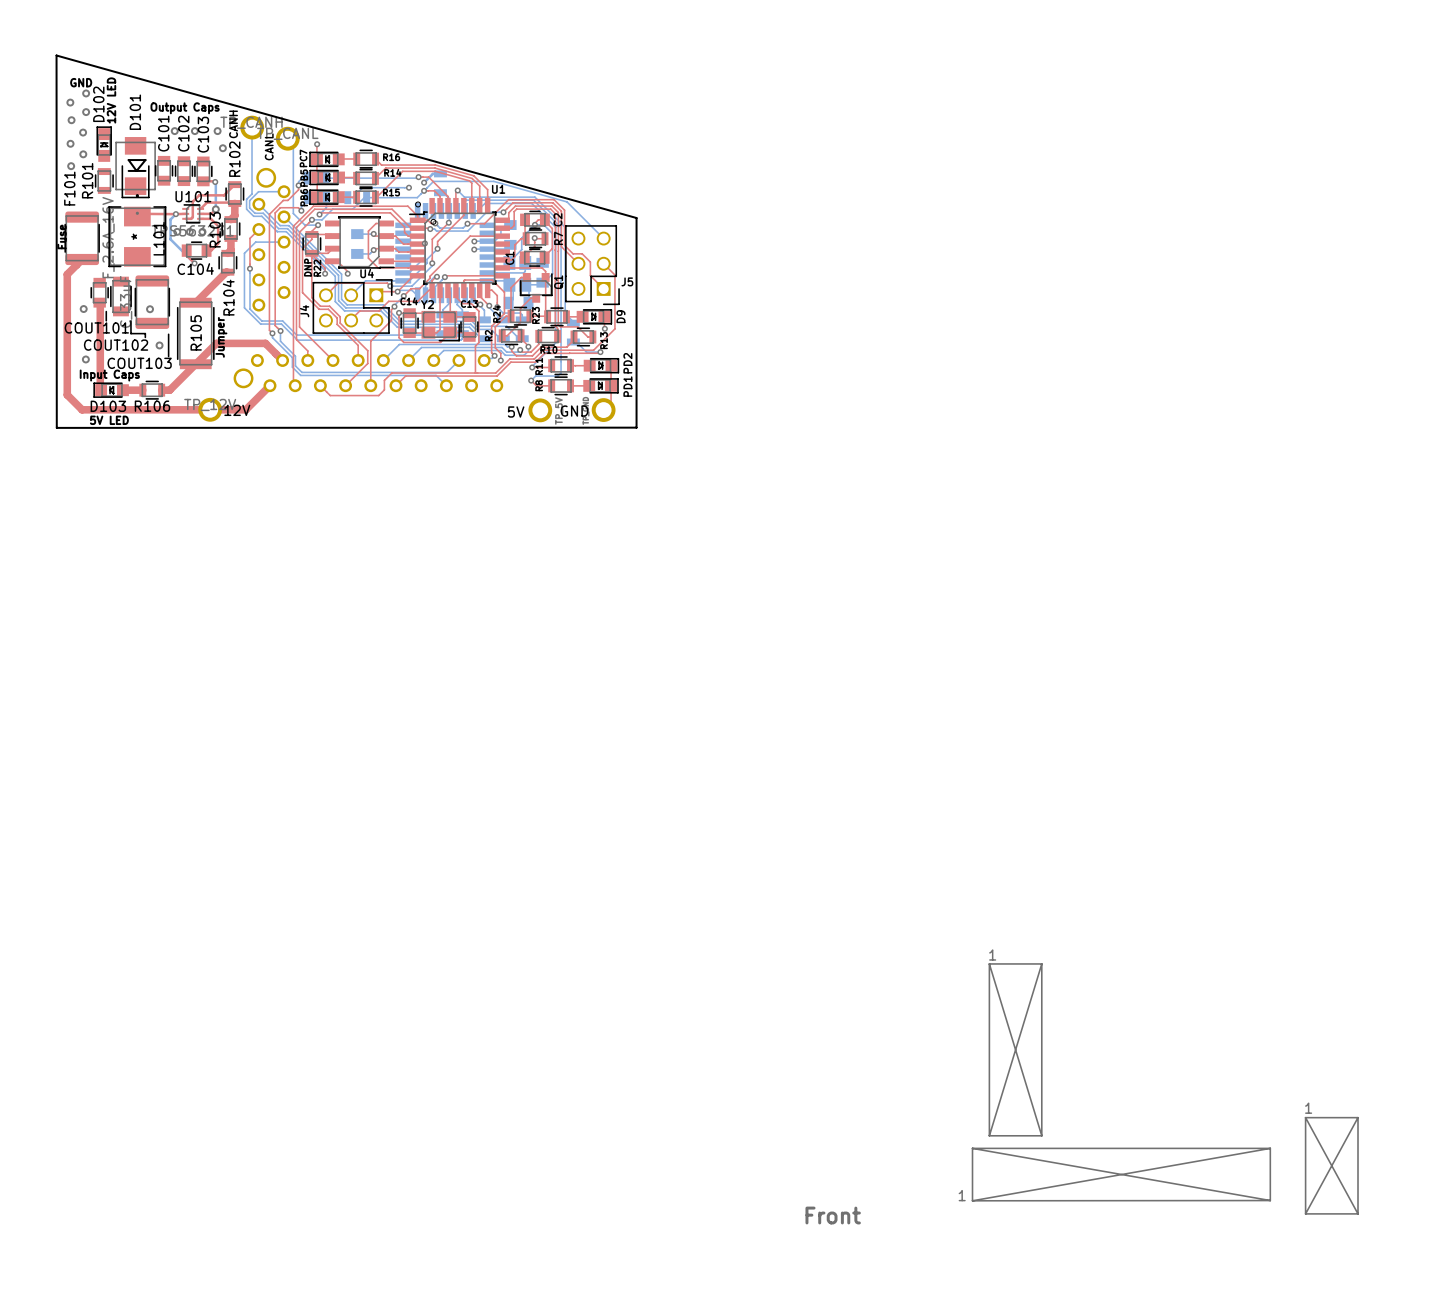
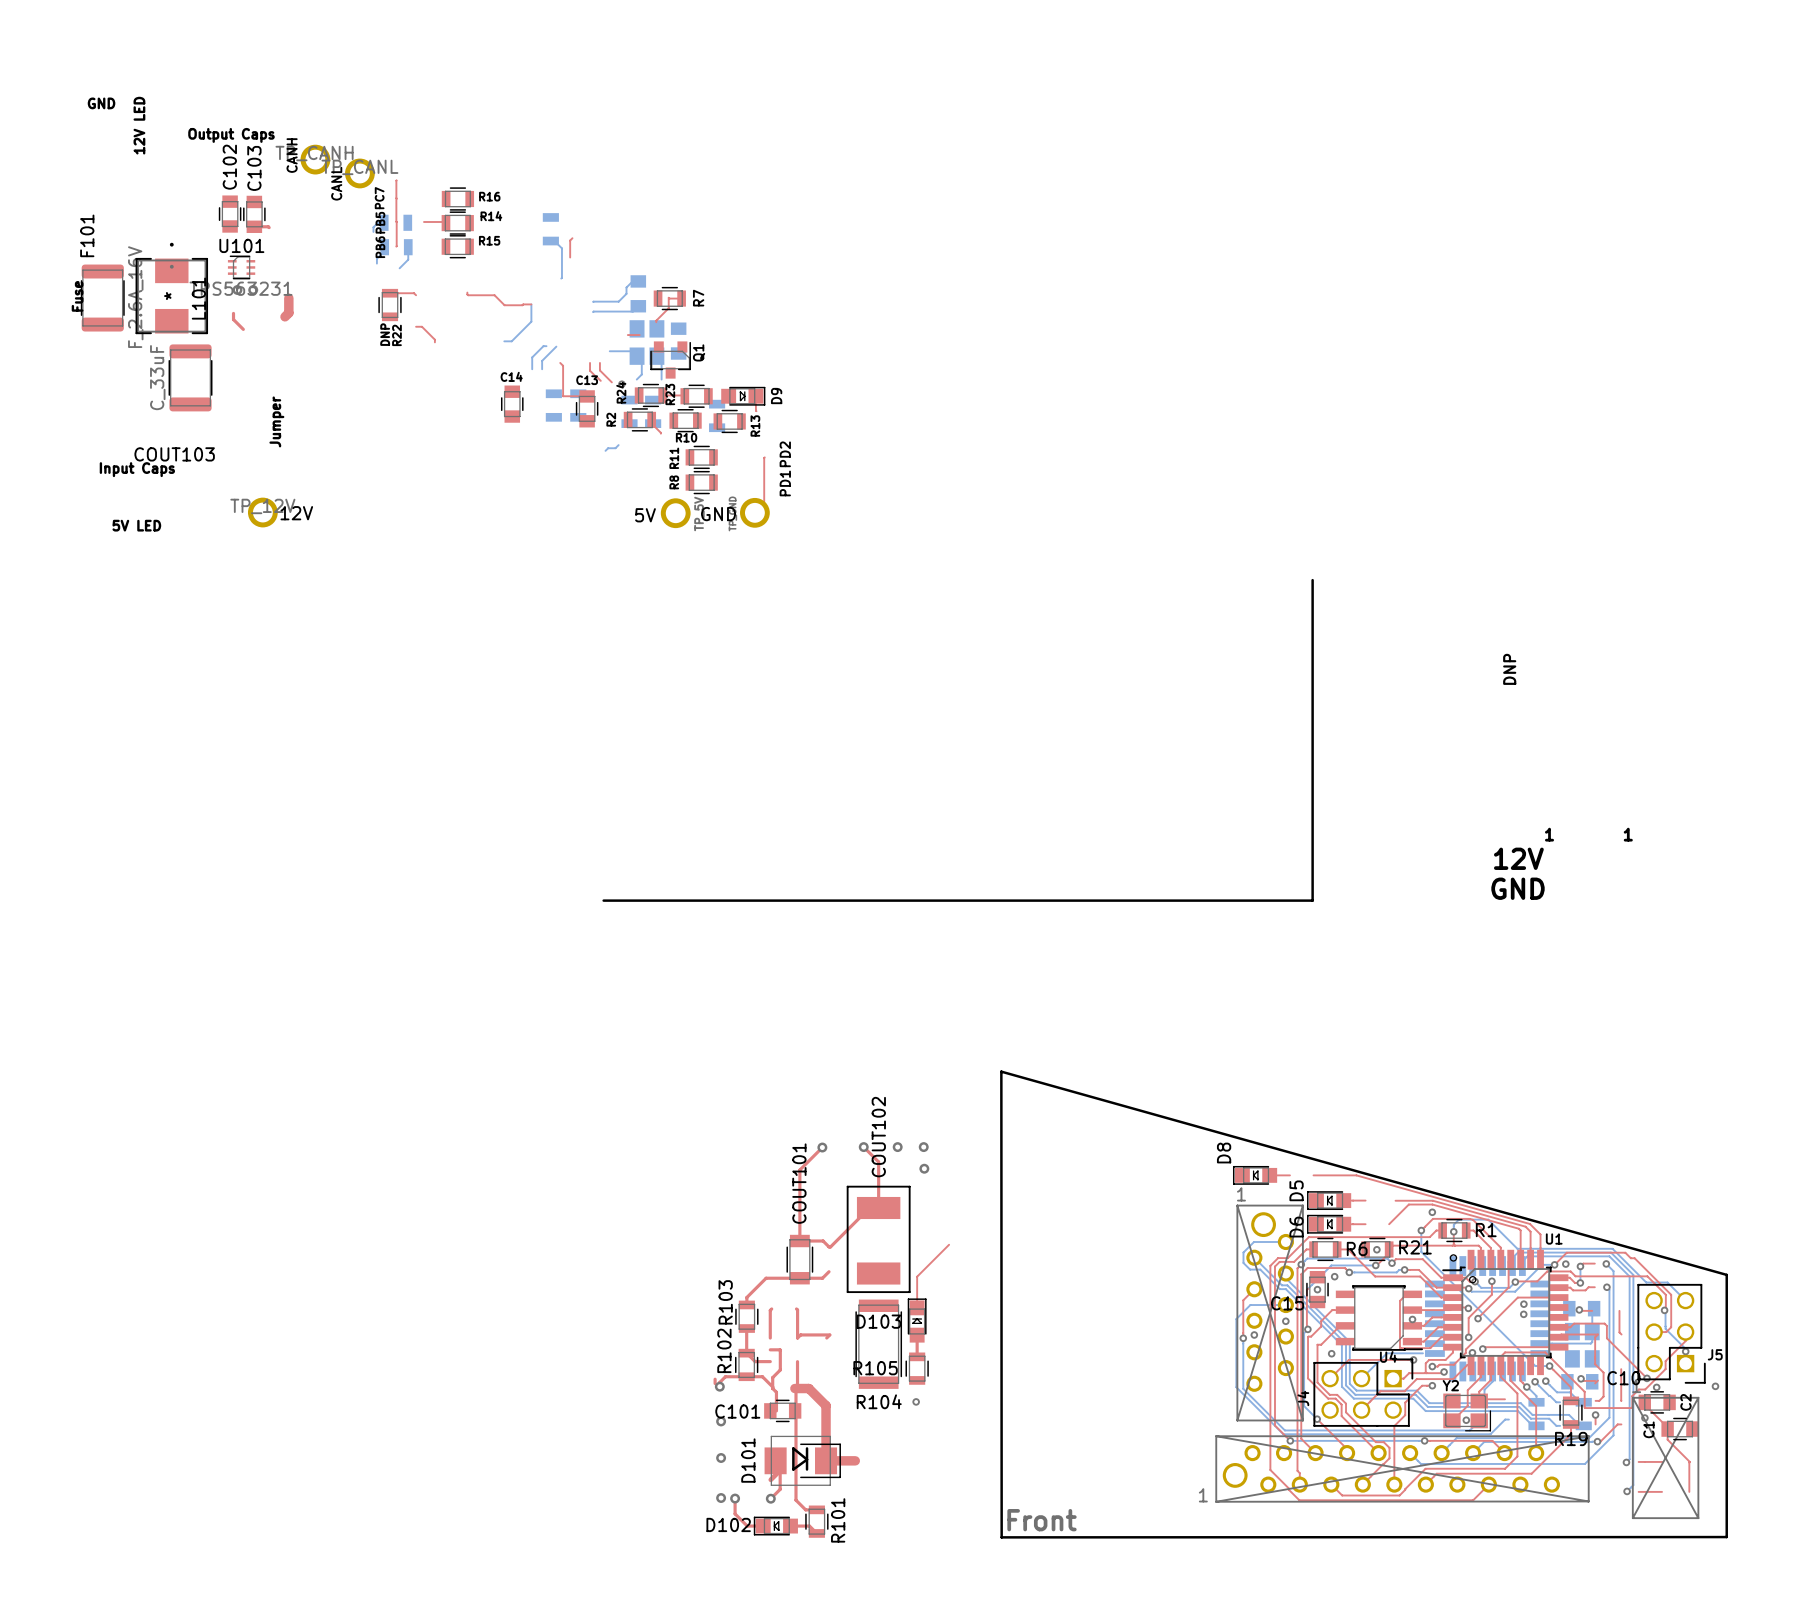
board edge: (56, 55) (56, 427) (636, 427) (636, 218) (56, 55) -> none
via: (86, 93) -> none
via: (70, 102) -> none
via: (86, 112) -> none
via: (71, 120) -> none
via: (174, 131) -> none
via: (194, 131) -> none
via: (217, 131) -> none
via: (83, 132) -> none
C101 name position: C101 (163, 133) -> C101 (737, 1411)
bottom track: (252, 138) (252, 193) (246, 199) (246, 209) (253, 216) (261, 216) (276, 231) -> none
bottom track: (287, 138) (293, 144) (293, 213) (304, 225) (318, 225) -> none
via: (70, 143) -> none
D102 rotation: 0° (104, 144) -> 90° counterclockwise (775, 1526)
D102 position: (104, 144) -> (775, 1526)
via: (317, 144) -> none
via: (222, 148) -> none
via: (83, 154) -> none
top track: (338, 158) (354, 158) -> none
R102 name position: R102 (234, 159) -> R102 (724, 1350)
part: (327, 159) -> none
top track: (375, 159) (381, 165) (435, 165) (473, 175) (487, 189) (487, 205) -> none
via: (71, 166) -> none
D101 rotation: 0° (135, 167) -> 90° counterclockwise (802, 1460)
D101 position: (135, 167) -> (802, 1460)
C101 rotation: 0° (164, 170) -> 90° clockwise (782, 1410)
C101 position: (164, 170) -> (782, 1410)
bottom track: (440, 173) (432, 173) (424, 182) -> none
part: (327, 177) -> none
top track: (418, 177) (428, 177) (447, 196) (447, 205) -> none
bottom track: (418, 177) (326, 178) -> none
via: (418, 177) -> none
top track: (375, 178) (385, 168) (434, 168) (472, 178) (479, 186) (479, 205) -> none
R101 name position: R101 (87, 180) -> R101 (838, 1520)
R101 position: (104, 180) -> (816, 1521)
bottom track: (215, 181) (215, 209) -> none
via: (215, 181) -> none
via: (424, 182) -> none
top track: (233, 183) (224, 195) (199, 195) (192, 201) (192, 217) (185, 218) -> none
top track: (298, 185) (298, 189) (287, 200) (283, 200) (269, 214) (269, 330) (272, 333) -> none
via: (298, 185) -> none
bottom track: (408, 187) (362, 187) (352, 197) (347, 197) -> none
via: (408, 187) -> none
top track: (424, 190) (434, 190) (440, 196) (440, 205) -> none
via: (424, 190) -> none
bottom track: (457, 190) (464, 197) (534, 197) (565, 227) (565, 313) (574, 323) -> none
via: (457, 190) -> none
bottom track: (284, 191) (258, 191) (249, 200) (249, 207) (254, 213) (263, 213) (278, 228) (287, 228) (335, 276) (335, 301) (344, 310) (381, 310) (397, 327) (469, 327) (481, 338) (484, 338) -> none
R102 position: (234, 194) -> (746, 1364)
part: (327, 197) -> none
top track: (338, 197) (356, 197) -> none
part: (357, 197) -> none
top track: (375, 197) (402, 171) (435, 171) (469, 180) (471, 183) (471, 205) -> none
top track: (236, 202) (206, 202) (200, 208) -> none
top track: (234, 203) (234, 215) (230, 219) -> none
bottom track: (258, 204) (280, 225) (288, 225) (338, 275) (338, 300) (345, 307) (382, 307) (398, 324) (470, 324) (475, 329) (491, 329) (500, 338) (503, 338) -> none
top track: (463, 205) (463, 215) (437, 241) (437, 248) -> none
top track: (215, 209) (211, 213) (200, 213) -> none
via: (215, 209) -> none
top track: (301, 210) (298, 207) (280, 207) (275, 212) (275, 325) (280, 330) -> none
via: (301, 210) -> none
bottom track: (465, 210) (466, 200) (533, 200) (561, 227) (561, 372) (557, 376) (535, 376) (531, 380) -> none
bottom track: (473, 210) (477, 210) (484, 203) (531, 203) (555, 227) (555, 342) (532, 367) -> none
top track: (503, 212) (512, 202) (552, 202) (561, 211) (561, 246) (578, 263) -> none
bottom track: (503, 212) (486, 212) (467, 231) (436, 231) (430, 229) -> none
via: (503, 212) -> none
top track: (185, 213) (140, 213) (137, 216) -> none
bottom track: (175, 214) (170, 219) (170, 239) (194, 263) -> none
via: (175, 214) -> none
top track: (319, 214) (321, 212) (390, 212) (404, 227) (404, 232) (408, 236) (417, 236) -> none
via: (319, 214) -> none
bottom track: (284, 216) (341, 274) (341, 299) (347, 304) (383, 304) (399, 321) (471, 321) (476, 326) (506, 326) (519, 338) (522, 338) -> none
top track: (200, 218) (210, 218) (218, 226) (218, 243) (211, 250) (206, 250) -> none
top track: (311, 219) (299, 232) (299, 327) (332, 360) -> none
bottom track: (311, 219) (322, 219) (332, 209) (352, 209) (364, 197) (417, 197) (433, 181) (493, 181) (567, 201) (603, 238) -> none
via: (311, 219) -> none
top track: (525, 219) (526, 238) (521, 238) (514, 245) (514, 256) (511, 259) (502, 259) -> none
C2 position: (534, 219) -> (1657, 1402)
top track: (502, 220) (508, 220) (508, 212) (515, 206) (551, 206) (558, 212) (558, 251) -> none
top track: (448, 222) (432, 239) (432, 263) -> none
via: (448, 222) -> none
top track: (386, 223) (376, 223) (368, 231) (368, 258) (378, 267) (417, 267) -> none
top track: (435, 223) (431, 223) (427, 220) (417, 220) (417, 216) (407, 206) (313, 206) (293, 226) (293, 383) (295, 385) -> none
bottom track: (435, 223) (439, 228) (463, 228) (467, 223) -> none
via: (435, 223) -> none
top track: (467, 223) (484, 223) (508, 199) (554, 199) (564, 210) (564, 245) (573, 253) (582, 253) (590, 262) (590, 275) (603, 288) -> none
via: (467, 223) -> none
top track: (534, 224) (538, 219) (544, 219) (552, 228) (552, 248) (544, 257) -> none
via: (534, 224) -> none
top track: (318, 225) (311, 231) (311, 239) (302, 248) (302, 292) (319, 309) (328, 309) (337, 318) (337, 324) (358, 345) (358, 360) -> none
via: (318, 225) -> none
top track: (502, 228) (511, 228) (514, 225) (514, 211) (516, 209) (550, 209) (555, 213) (555, 249) -> none
R103 name position: R103 (215, 229) -> R103 (725, 1302)
R103 position: (230, 229) -> (746, 1316)
top track: (258, 229) (249, 238) (249, 268) -> none
top track: (430, 229) (411, 228) (392, 209) (314, 209) (296, 227) (296, 339) (307, 350) (307, 360) -> none
via: (430, 229) -> none
via: (177, 231) -> none
bottom track: (277, 231) (286, 231) (325, 270) (325, 273) -> none
via: (373, 233) -> none
bottom track: (357, 234) (372, 234) -> none
top track: (502, 236) (470, 236) (419, 288) (411, 288) (403, 296) -> none
via: (534, 238) -> none
part: (271, 239) -> none
via: (474, 241) -> none
bottom track: (284, 242) (255, 242) (244, 253) (244, 307) (260, 324) (281, 324) (297, 340) (460, 340) (462, 333) -> none
U4 position: (359, 242) -> (1379, 1317)
via: (424, 243) -> none
part: (357, 244) -> none
top track: (332, 248) (328, 253) (311, 253) (311, 297) (320, 306) (329, 306) (340, 316) (340, 323) (367, 350) (367, 363) (345, 385) -> none
bottom track: (437, 248) (426, 259) (426, 263) (409, 280) (365, 280) (351, 295) -> none
via: (437, 248) -> none
U1 position: (459, 248) -> (1505, 1312)
R104 footprint: [218, 249, 238, 276] -> [855, 1299, 903, 1389]
via: (474, 249) -> none
C104: (196, 250) -> none
top track: (373, 250) (395, 248) (398, 252) (417, 252) -> none
bottom track: (373, 250) (369, 253) (357, 253) -> none
via: (373, 250) -> none
top track: (555, 250) (555, 326) (557, 328) (557, 336) -> none
top track: (558, 251) (558, 324) (560, 326) (577, 326) (587, 336) (592, 336) -> none
part: (445, 253) -> none
top track: (311, 254) (325, 268) (325, 273) -> none
C1 position: (534, 257) -> (1680, 1429)
top track: (82, 259) (67, 274) (67, 394) (82, 409) (245, 409) (270, 385) -> none
top track: (417, 259) (386, 261) -> none
bottom track: (509, 262) (521, 249) (521, 238) (534, 224) (543, 224) (552, 233) (552, 273) (540, 284) (525, 284) -> none
bottom track: (542, 262) (525, 262) (523, 272) (487, 272) -> none
via: (194, 263) -> none
bottom track: (432, 263) (432, 265) (411, 286) (390, 286) -> none
via: (432, 263) -> none
top track: (603, 263) (614, 275) (614, 328) (593, 350) (543, 350) (534, 359) (509, 359) (495, 373) (391, 373) (384, 380) (384, 389) (378, 395) (330, 395) (320, 385) -> none
J5 position: (592, 265) -> (1671, 1333)
top track: (511, 267) (542, 267) (545, 271) (545, 316) -> none
bottom track: (249, 268) (249, 309) (261, 321) (282, 321) (296, 335) (442, 333) -> none
via: (249, 268) -> none
top track: (227, 272) (196, 301) -> none
via: (325, 273) -> none
via: (347, 273) -> none
top track: (417, 275) (413, 275) (397, 291) (379, 291) (369, 300) -> none
top track: (502, 275) (444, 277) -> none
COUT102 footprint: [110, 276, 132, 317] -> [846, 1185, 911, 1294]
top track: (436, 276) (432, 280) (432, 290) (429, 290) (417, 301) (388, 301) (379, 311) (359, 311) (351, 319) -> none
via: (436, 276) -> none
COUT101 footprint: [90, 277, 109, 308] -> [786, 1234, 814, 1285]
via: (444, 277) -> none
top track: (526, 277) (521, 277) (511, 287) (511, 316) (506, 316) (495, 326) (495, 347) (500, 353) (500, 360) -> none
top track: (390, 286) (387, 283) (338, 283) (325, 295) -> none
via: (390, 286) -> none
top track: (440, 290) (440, 329) (436, 332) (409, 333) -> none
top track: (455, 290) (455, 296) (462, 303) (471, 303) (478, 311) (478, 342) (475, 346) (475, 373) -> none
top track: (463, 290) (464, 280) (492, 280) (504, 292) (504, 313) (491, 326) (491, 352) (494, 355) -> none
top track: (487, 290) (491, 290) (497, 295) (497, 307) -> none
bottom track: (397, 291) (412, 290) (417, 295) -> none
via: (397, 291) -> none
bottom track: (449, 295) (449, 303) (442, 309) (442, 314) -> none
bottom track: (457, 295) (457, 304) (462, 309) (462, 314) -> none
bottom track: (403, 296) (394, 306) -> none
via: (403, 296) -> none
R105 footprint: [177, 297, 215, 370] -> [905, 1352, 929, 1385]
top track: (536, 298) (530, 298) (520, 308) (520, 322) (507, 335) (502, 335) -> none
top track: (99, 302) (101, 390) -> none
part: (518, 302) -> none
bottom track: (480, 304) (484, 310) (484, 319) -> none
via: (480, 304) -> none
bottom track: (489, 305) (503, 319) -> none
via: (489, 305) -> none
J4 position: (352, 306) -> (1363, 1392)
top track: (394, 306) (391, 309) (391, 320) (370, 341) (370, 385) -> none
via: (394, 306) -> none
bottom track: (497, 307) (503, 313) (520, 313) (522, 319) -> none
via: (83, 309) -> none
via: (150, 309) -> none
line: (106, 311) (106, 320) -> none
via: (399, 312) -> none
top track: (428, 316) (424, 313) (399, 312) (399, 337) (403, 342) (440, 342) (450, 332) (465, 332) (469, 336) -> none
top track: (566, 316) (582, 316) -> none
line: (130, 320) (130, 333) (145, 333) (145, 337) -> none
Y2 position: (440, 326) -> (1467, 1412)
COUT101 name position: COUT101 (96, 327) -> COUT101 (799, 1183)
via: (604, 328) -> none
part: (484, 329) -> none
via: (280, 330) -> none
bottom track: (280, 331) (280, 341) (295, 356) (295, 365) (301, 372) (447, 372) (458, 360) -> none
R105 name position: R105 (196, 332) -> R105 (875, 1368)
bottom track: (272, 333) (272, 337) (292, 357) (292, 367) (300, 375) (436, 375) (446, 385) -> none
via: (272, 333) -> none
line: (168, 334) (168, 356) -> none
top track: (538, 335) (538, 344) (530, 352) (522, 352) (520, 349) -> none
top track: (574, 336) (574, 339) (566, 347) (541, 347) (532, 355) (516, 355) (511, 351) (511, 346) -> none
bottom track: (573, 342) (576, 342) (586, 352) (600, 352) -> none
COUT102 name position: COUT102 (116, 345) -> COUT102 (878, 1137)
via: (159, 345) -> none
bottom track: (511, 346) (505, 344) (399, 344) (383, 360) -> none
via: (511, 346) -> none
bottom track: (528, 346) (528, 351) (524, 355) (505, 355) (500, 350) (443, 350) (433, 360) -> none
via: (528, 346) -> none
bottom track: (520, 349) (518, 352) (506, 352) (502, 347) (421, 347) (408, 360) -> none
via: (520, 349) -> none
top track: (600, 352) (569, 353) -> none
via: (600, 352) -> none
top track: (569, 353) (544, 353) (535, 362) (510, 362) (497, 376) (405, 376) (395, 385) -> none
via: (494, 355) -> none
via: (85, 359) -> none
top track: (282, 360) (265, 343) (216, 343) (169, 390) (161, 390) -> none
via: (500, 360) -> none
top track: (551, 365) (549, 367) (532, 367) -> none
top track: (570, 365) (589, 365) -> none
part: (601, 365) -> none
via: (532, 367) -> none
part: (368, 373) -> none
top track: (531, 380) (536, 385) (551, 385) (551, 381) -> none
via: (531, 380) -> none
top track: (570, 385) (589, 385) -> none
part: (600, 385) -> none
D103 rotation: 0° (111, 390) -> 90° clockwise (917, 1320)
D103 position: (111, 390) -> (917, 1320)
top track: (122, 390) (142, 390) -> none
R106: (152, 390) -> none
board edge: none -> (1312, 580) (1312, 900) (603, 900)
text: none -> DNP (1509, 669)
text: none -> 1 (1549, 834)
text: none -> 1 (1628, 834)
text: none -> 12V (1518, 858)
text: none -> GND (1518, 888)
board edge: none -> (1001, 1071) (1001, 1537) (1726, 1537) (1726, 1274) (1001, 1071)
via: none -> (822, 1147)
top track: none -> (863, 1147) (878, 1161) (878, 1208) (869, 1208) (830, 1246) (823, 1241) (799, 1241) (799, 1170) (822, 1147)
via: none -> (863, 1147)
via: none -> (897, 1147)
via: none -> (923, 1147)
via: none -> (924, 1168)
D8: none -> (1255, 1175)
top track: none -> (1269, 1175) (1289, 1175)
top track: none -> (1313, 1175) (1356, 1175) (1529, 1223) (1540, 1234) (1540, 1259)
D5: none -> (1329, 1200)
top track: none -> (1343, 1200) (1365, 1200)
top track: none -> (1395, 1200) (1432, 1200) (1525, 1226) (1530, 1231) (1530, 1259)
via: none -> (1432, 1212)
D6: none -> (1329, 1224)
top track: none -> (1343, 1224) (1365, 1224)
top track: none -> (1389, 1224) (1408, 1204) (1432, 1204) (1518, 1228) (1520, 1230) (1520, 1259)
top track: none -> (1421, 1230) (1432, 1218) (1473, 1219) (1500, 1247) (1500, 1259)
bottom track: none -> (1421, 1230) (1421, 1251) (1535, 1366) (1549, 1366)
via: none -> (1421, 1230)
top track: none -> (1442, 1230) (1436, 1230) (1429, 1237) (1308, 1237) (1287, 1258) (1278, 1258) (1270, 1265) (1270, 1470) (1299, 1500) (1473, 1500) (1488, 1484)
R1: none -> (1454, 1230)
top track: none -> (1466, 1230) (1473, 1230) (1490, 1247) (1490, 1259)
top track: none -> (1453, 1231) (1455, 1245)
bottom track: none -> (1453, 1231) (1453, 1224) (1458, 1219) (1488, 1219) (1517, 1248) (1612, 1248) (1646, 1282) (1667, 1282) (1685, 1300)
via: none -> (1453, 1231)
bottom track: none -> (1285, 1241) (1254, 1241) (1243, 1252) (1243, 1262) (1250, 1269) (1260, 1269) (1279, 1289) (1285, 1289) (1341, 1345) (1341, 1386) (1353, 1398) (1413, 1398) (1425, 1411) (1518, 1411) (1532, 1425) (1536, 1425)
top track: none -> (949, 1244) (917, 1276) (917, 1307)
top track: none -> (1313, 1249) (1306, 1249) (1294, 1261) (1279, 1261) (1274, 1266) (1274, 1425) (1290, 1440)
R6: none -> (1325, 1249)
top track: none -> (1337, 1249) (1348, 1249) (1375, 1276) (1420, 1276) (1441, 1297) (1453, 1297)
via: none -> (1376, 1249)
R21: none -> (1377, 1249)
bottom track: none -> (1254, 1257) (1281, 1285) (1287, 1285) (1346, 1343) (1346, 1385) (1355, 1394) (1415, 1394) (1427, 1406) (1519, 1406) (1530, 1418) (1549, 1418) (1556, 1425) (1560, 1425)
top track: none -> (1480, 1259) (1480, 1247) (1478, 1245) (1392, 1245) (1389, 1249) (1389, 1253) (1375, 1265)
top track: none -> (1510, 1259) (1508, 1261) (1508, 1287) (1478, 1318)
top track: none -> (1392, 1263) (1395, 1259) (1422, 1259) (1441, 1277) (1465, 1277) (1469, 1281) (1475, 1281)
bottom track: none -> (1392, 1263) (1387, 1258) (1307, 1258) (1301, 1264)
via: none -> (1392, 1263)
via: none -> (1565, 1264)
top track: none -> (1594, 1263) (1583, 1263) (1580, 1266)
bottom track: none -> (1606, 1263) (1613, 1271) (1613, 1435) (1584, 1463) (1421, 1463) (1410, 1453)
via: none -> (1606, 1263)
top track: none -> (1301, 1264) (1297, 1268) (1297, 1470) (1299, 1473) (1299, 1484)
via: none -> (1301, 1264)
bottom track: none -> (1375, 1265) (1331, 1265) (1308, 1288)
via: none -> (1375, 1265)
top track: none -> (1554, 1264) (1566, 1252) (1625, 1252) (1630, 1258) (1634, 1258) (1671, 1294) (1671, 1327) (1666, 1332) (1654, 1332)
bottom track: none -> (1554, 1264) (1542, 1264) (1515, 1291) (1471, 1291) (1468, 1288)
via: none -> (1554, 1264)
bottom track: none -> (1512, 1266) (1512, 1257) (1517, 1252) (1611, 1252) (1633, 1274) (1633, 1485) (1627, 1491)
bottom track: none -> (1522, 1266) (1522, 1261) (1527, 1256) (1609, 1256) (1629, 1276) (1629, 1459) (1626, 1462)
bottom track: none -> (1580, 1266) (1580, 1282)
via: none -> (1580, 1266)
top track: none -> (1404, 1269) (1418, 1269) (1436, 1287) (1468, 1288)
bottom track: none -> (1404, 1269) (1399, 1269) (1396, 1272) (1349, 1272)
via: none -> (1404, 1269)
top track: none -> (829, 1271) (822, 1278) (766, 1278) (746, 1297) (746, 1304) (743, 1304)
top track: none -> (1349, 1272) (1344, 1268) (1307, 1268) (1301, 1274) (1301, 1438) (1315, 1453)
via: none -> (1349, 1272)
bottom track: none -> (1285, 1273) (1285, 1278) (1349, 1342) (1349, 1383) (1356, 1390) (1416, 1390) (1429, 1403) (1520, 1403) (1532, 1414) (1569, 1414) (1580, 1425) (1583, 1425)
via: none -> (1334, 1276)
top track: none -> (1558, 1277) (1569, 1277) (1575, 1282) (1580, 1282)
bottom track: none -> (1475, 1281) (1481, 1287) (1509, 1287) (1515, 1282)
via: none -> (1475, 1281)
top track: none -> (1491, 1281) (1491, 1294) (1468, 1317) (1468, 1337)
via: none -> (1491, 1281)
top track: none -> (1515, 1282) (1537, 1281) (1547, 1271) (1570, 1271) (1575, 1276) (1647, 1276) (1665, 1294) (1664, 1310)
via: none -> (1515, 1282)
via: none -> (1580, 1282)
top track: none -> (1594, 1287) (1588, 1287) (1585, 1290) (1558, 1287)
bottom track: none -> (1606, 1287) (1609, 1289) (1609, 1417) (1588, 1438) (1456, 1438) (1441, 1453)
via: none -> (1606, 1287)
top track: none -> (1254, 1289) (1243, 1300) (1243, 1338)
top track: none -> (1308, 1288) (1307, 1329)
via: none -> (1468, 1288)
C15: none -> (1317, 1289)
via: none -> (1317, 1289)
top track: none -> (1412, 1294) (1406, 1294) (1399, 1300) (1399, 1347) (1430, 1348) (1441, 1337) (1453, 1337)
top track: none -> (1558, 1297) (1517, 1297) (1465, 1349) (1465, 1352) (1453, 1364) (1432, 1366)
part: none -> (1270, 1302)
via: none -> (1523, 1304)
bottom track: none -> (1285, 1305) (1250, 1305) (1236, 1319) (1236, 1387) (1283, 1434) (1490, 1434) (1505, 1419) (1508, 1419)
top track: none -> (771, 1308) (770, 1338)
top track: none -> (796, 1308) (797, 1338) (800, 1334) (829, 1334) (826, 1338)
top track: none -> (1468, 1308) (1412, 1310)
via: none -> (1468, 1308)
part: none -> (1581, 1308)
bottom track: none -> (1594, 1308) (1592, 1310) (1590, 1343) (1540, 1343)
top track: none -> (1345, 1310) (1332, 1310) (1321, 1321) (1321, 1326) (1311, 1336) (1308, 1337) (1308, 1378) (1328, 1398) (1335, 1398) (1341, 1404) (1341, 1416) (1378, 1453)
top track: none -> (1579, 1309) (1592, 1310)
via: none -> (1579, 1309)
bottom track: none -> (1664, 1310) (1665, 1328) (1685, 1349) (1685, 1351)
via: none -> (1664, 1310)
top track: none -> (1619, 1310) (1619, 1332) (1621, 1334)
via: none -> (1523, 1314)
top track: none -> (1453, 1317) (1432, 1317) (1423, 1325) (1412, 1325) (1412, 1319)
via: none -> (1478, 1318)
part: none -> (1487, 1318)
via: none -> (1412, 1319)
via: none -> (1285, 1321)
top track: none -> (1345, 1325) (1340, 1325) (1321, 1344) (1317, 1344) (1317, 1382) (1329, 1394) (1337, 1394) (1346, 1403) (1346, 1412) (1375, 1442) (1383, 1442) (1389, 1447) (1389, 1458) (1362, 1484)
top track: none -> (1453, 1327) (1438, 1327) (1423, 1341) (1412, 1341)
top track: none -> (1558, 1327) (1570, 1327) (1574, 1323) (1604, 1323) (1606, 1325) (1606, 1338) (1647, 1378)
top track: none -> (746, 1328) (746, 1353) (755, 1361) (770, 1361)
bottom track: none -> (1307, 1329) (1304, 1333) (1304, 1406) (1317, 1419)
via: none -> (1307, 1329)
top track: none -> (1685, 1332) (1685, 1341) (1665, 1361) (1665, 1369) (1645, 1389) (1638, 1389) (1632, 1396) (1631, 1408) (1585, 1408) (1584, 1391) (1545, 1352) (1505, 1352) (1500, 1356) (1500, 1376) (1517, 1393) (1517, 1456) (1505, 1468) (1425, 1468) (1399, 1495) (1342, 1495) (1331, 1484)
top track: none -> (917, 1335) (917, 1356)
via: none -> (1254, 1334)
via: none -> (1468, 1337)
top track: none -> (1558, 1337) (1561, 1334) (1597, 1334) (1595, 1337) (1595, 1364) (1603, 1372) (1603, 1396) (1599, 1400) (1595, 1400)
bottom track: none -> (1243, 1338) (1243, 1388) (1284, 1430) (1469, 1430) (1480, 1419) (1484, 1419)
via: none -> (1243, 1338)
part: none -> (1582, 1345)
top track: none -> (1453, 1347) (1453, 1352) (1445, 1359) (1429, 1359) (1425, 1363) (1426, 1373)
top track: none -> (1558, 1347) (1484, 1347) (1482, 1349)
via: none -> (1482, 1349)
top track: none -> (770, 1349) (780, 1350) (780, 1369) (772, 1377) (772, 1388) (776, 1392) (776, 1410)
via: none -> (1685, 1351)
top track: none -> (1472, 1352) (1471, 1365) (1467, 1365) (1453, 1379) (1416, 1379) (1404, 1391) (1380, 1391) (1361, 1410)
via: none -> (1472, 1352)
via: none -> (1331, 1353)
bottom track: none -> (1422, 1353) (1386, 1353) (1361, 1378)
top track: none -> (1413, 1359) (1348, 1359) (1330, 1378)
via: none -> (1413, 1359)
top track: none -> (797, 1361) (796, 1500) (805, 1509) (816, 1509)
top track: none -> (1480, 1365) (1480, 1376) (1467, 1390) (1467, 1405) (1450, 1420)
top track: none -> (1490, 1365) (1490, 1380) (1479, 1391) (1479, 1401) (1480, 1399) (1504, 1399)
top track: none -> (1510, 1365) (1510, 1380) (1536, 1406) (1536, 1453)
top track: none -> (1520, 1365) (1520, 1380) (1526, 1387)
via: none -> (1432, 1366)
top track: none -> (1549, 1366) (1571, 1387) (1571, 1400)
via: none -> (1549, 1366)
top track: none -> (1621, 1369) (1621, 1400)
bottom track: none -> (1492, 1371) (1492, 1381) (1484, 1389) (1484, 1395)
top track: none -> (1444, 1371) (1409, 1373) (1403, 1378) (1393, 1378)
via: none -> (1444, 1371)
top track: none -> (715, 1379) (715, 1383)
top track: none -> (1581, 1378) (1583, 1380) (1595, 1380)
via: none -> (1581, 1378)
via: none -> (1647, 1378)
top track: none -> (1597, 1380) (1595, 1383)
bottom track: none -> (1535, 1381) (1556, 1402) (1560, 1402)
via: none -> (1535, 1381)
bottom track: none -> (1545, 1381) (1557, 1392) (1570, 1392) (1580, 1402) (1583, 1402)
via: none -> (1545, 1381)
C10: none -> (1579, 1381)
top track: none -> (719, 1386) (719, 1382) (725, 1376) (762, 1376) (772, 1386)
via: none -> (719, 1386)
top track: none -> (1432, 1385) (1422, 1385) (1405, 1402) (1405, 1415) (1394, 1426) (1394, 1484)
via: none -> (1432, 1385)
via: none -> (1715, 1386)
bottom track: none -> (1526, 1387) (1536, 1396) (1536, 1402)
via: none -> (1526, 1387)
via: none -> (1656, 1387)
top track: none -> (794, 1388) (808, 1388) (826, 1405) (826, 1460) (855, 1460)
via: none -> (916, 1401)
top track: none -> (1644, 1404) (1667, 1427) (1667, 1439) (1689, 1461) (1689, 1491)
R19: none -> (1571, 1412)
part: none -> (1536, 1414)
part: none -> (1583, 1414)
top track: none -> (1595, 1415) (1595, 1424)
via: none -> (1595, 1415)
via: none -> (1644, 1418)
top track: none -> (1317, 1419) (1345, 1447) (1347, 1453)
via: none -> (1317, 1419)
via: none -> (1466, 1420)
via: none -> (721, 1421)
top track: none -> (1571, 1424) (1571, 1434) (1531, 1473) (1436, 1473) (1425, 1484)
top track: none -> (1621, 1424) (1617, 1424) (1600, 1441) (1597, 1441)
bottom track: none -> (1290, 1440) (1424, 1440)
via: none -> (1290, 1440)
top track: none -> (1424, 1440) (1492, 1440) (1504, 1453)
via: none -> (1424, 1440)
bottom track: none -> (1597, 1441) (1484, 1441) (1473, 1453)
via: none -> (1597, 1441)
via: none -> (721, 1458)
top track: none -> (1638, 1461) (1662, 1461)
via: none -> (1626, 1462)
part: none -> (1391, 1468)
top track: none -> (780, 1470) (780, 1489) (770, 1498)
top track: none -> (780, 1470) (770, 1479)
via: none -> (1627, 1491)
top track: none -> (1638, 1491) (1662, 1491)
via: none -> (721, 1498)
top track: none -> (735, 1498) (735, 1513) (747, 1526) (763, 1526)
via: none -> (735, 1498)
via: none -> (770, 1498)
top track: none -> (790, 1526) (809, 1526) (816, 1533)

